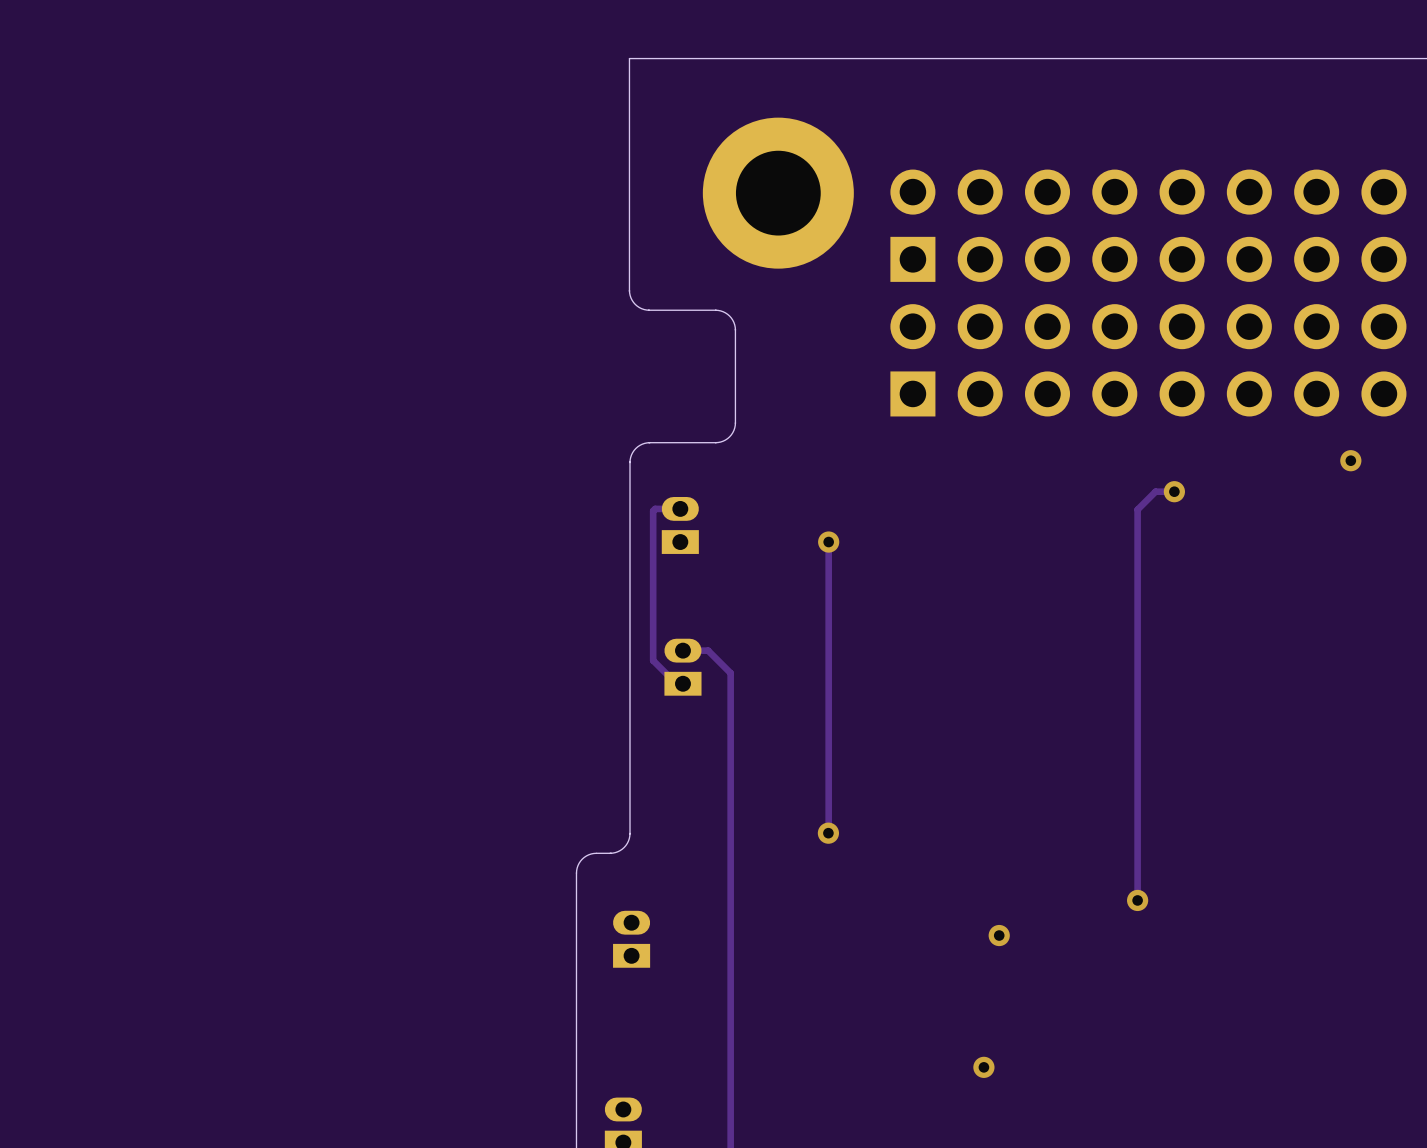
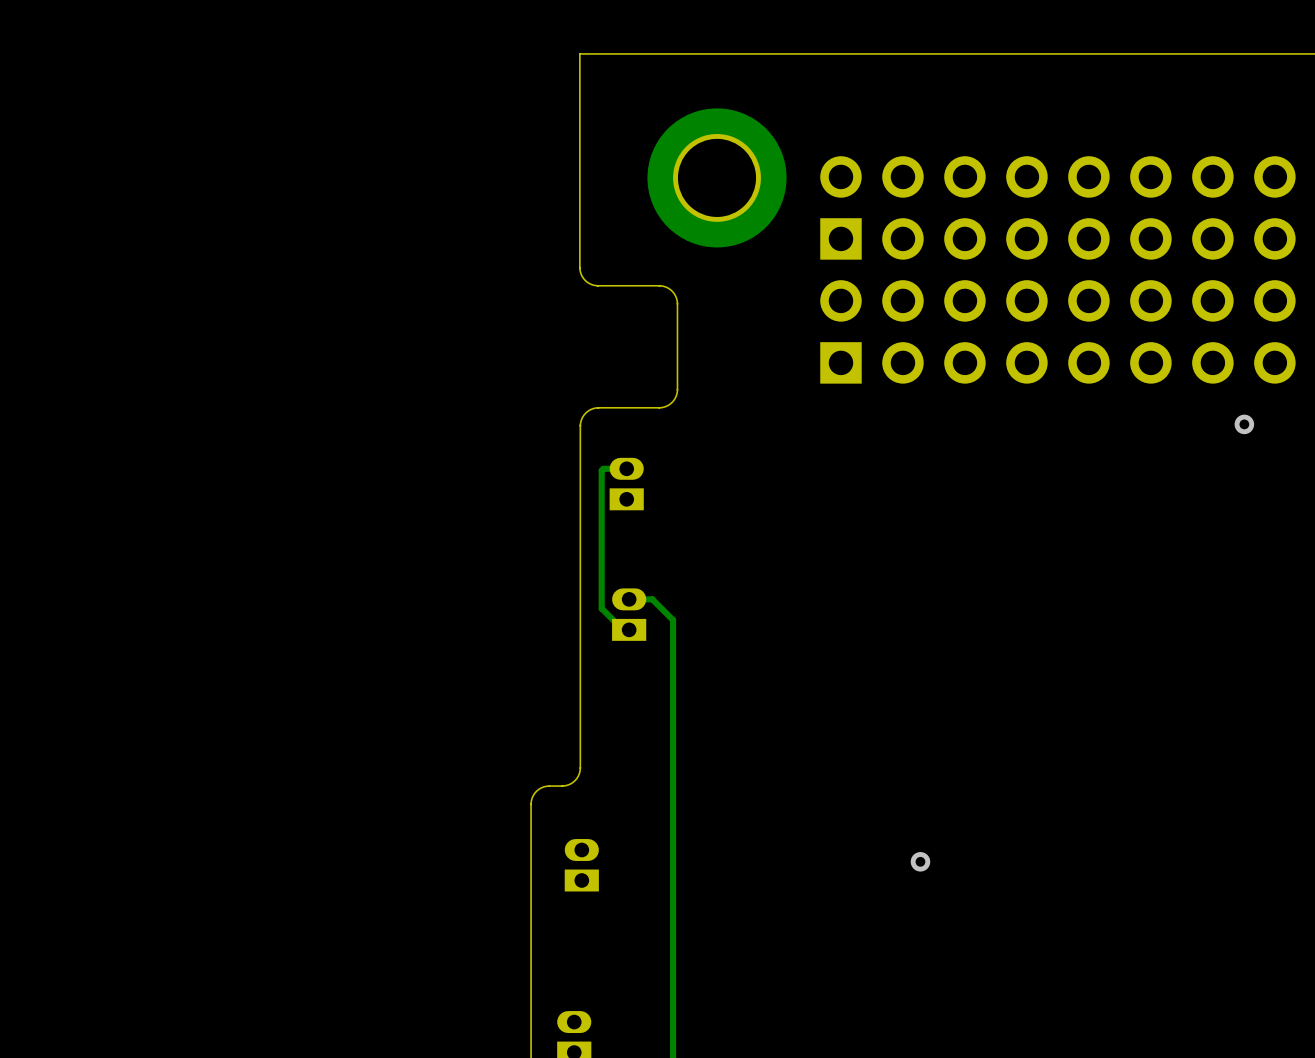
via: (1174, 491) -> none
track: (1175, 491) (1155, 491) (1137, 509) (1137, 900) -> none
track: (828, 542) (828, 832) -> none
via: (828, 542) -> none
via: (828, 833) -> none
via: (1137, 900) -> none
via: (983, 1067) -> none

